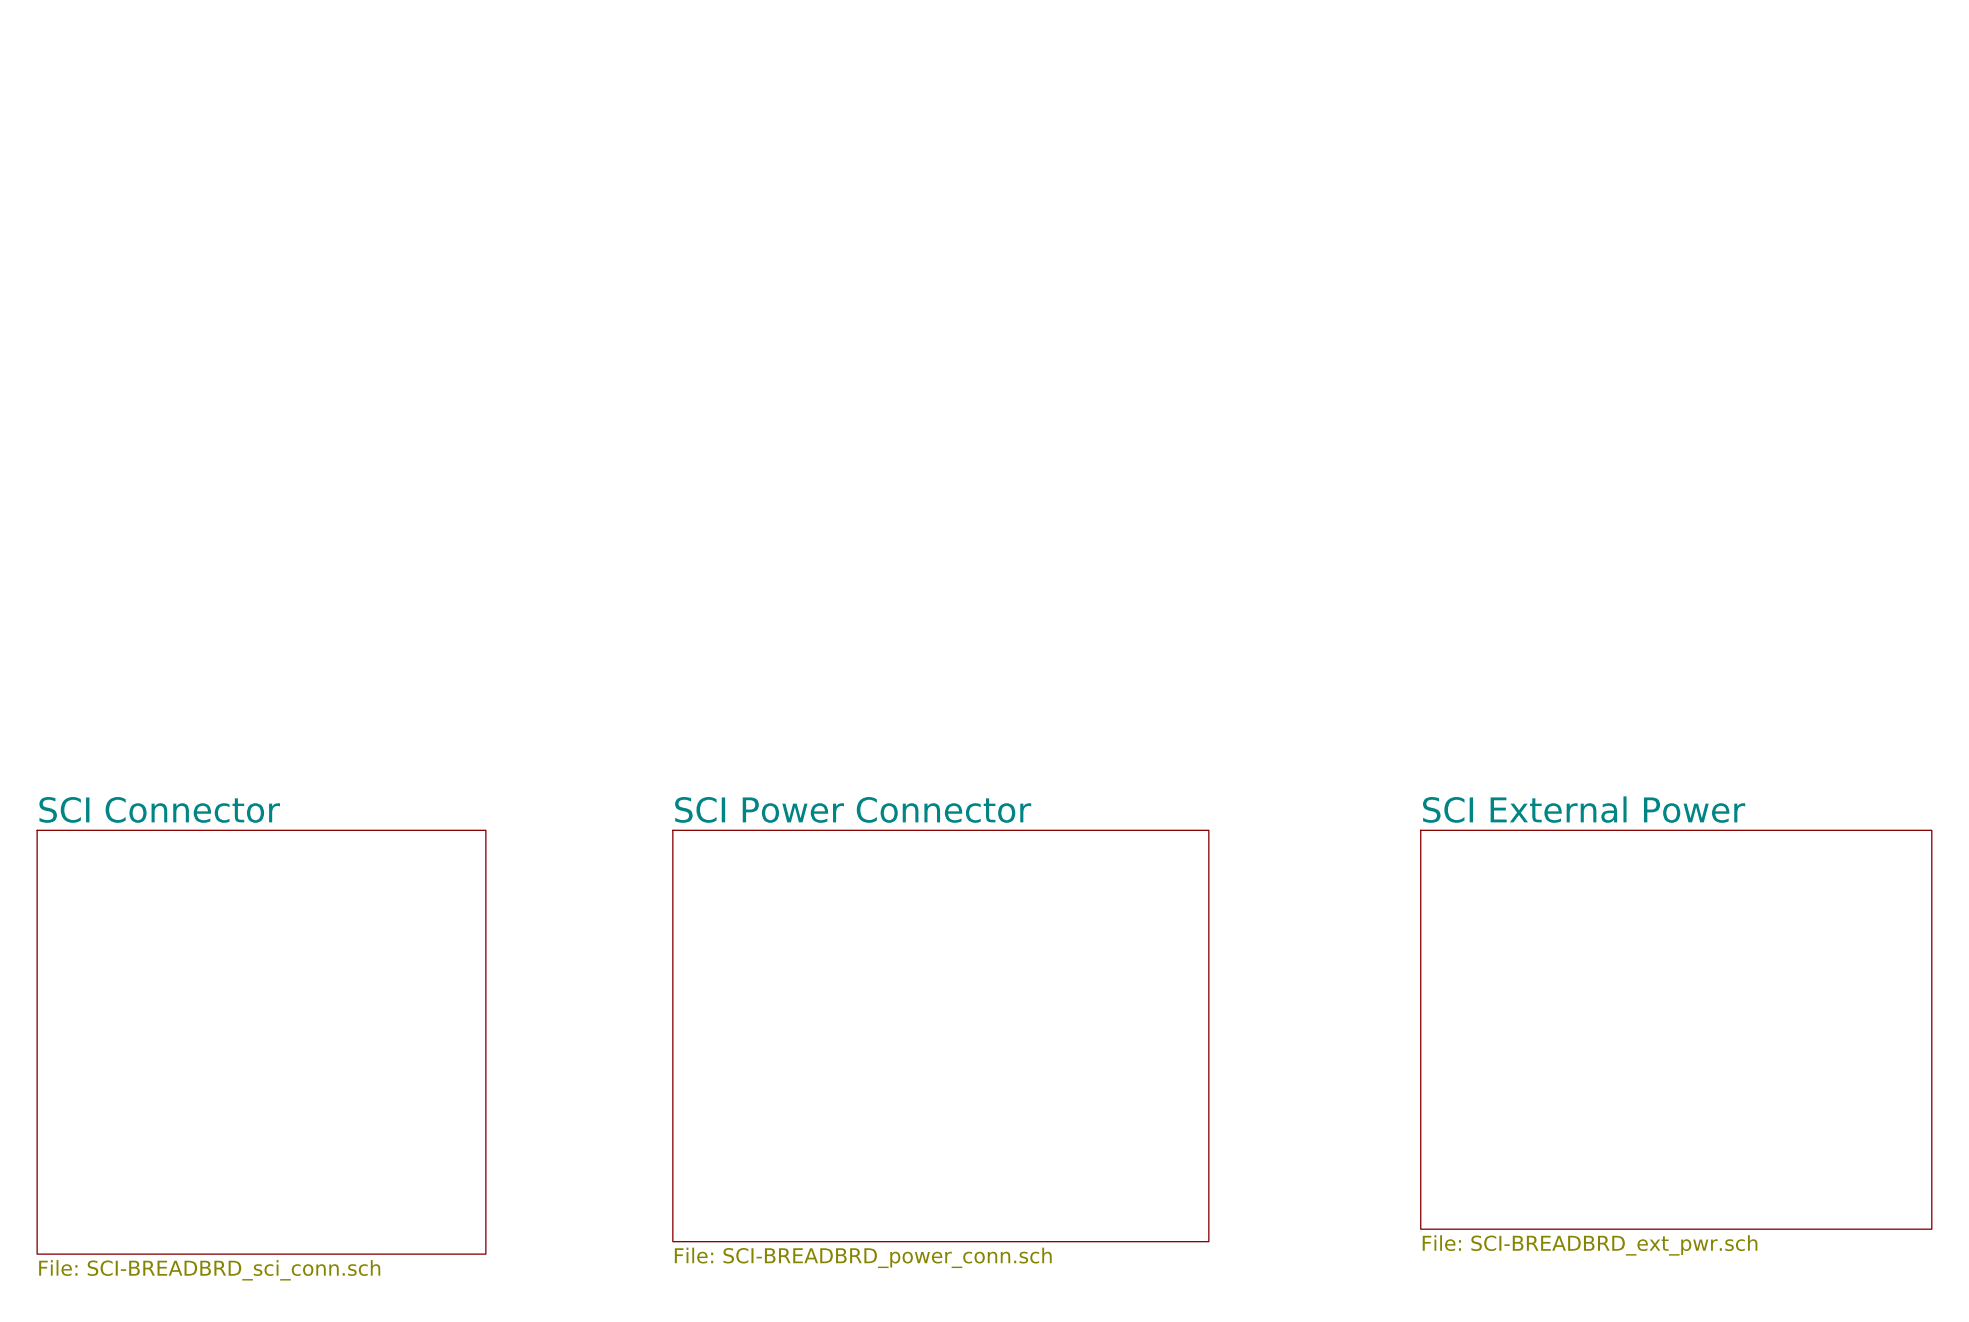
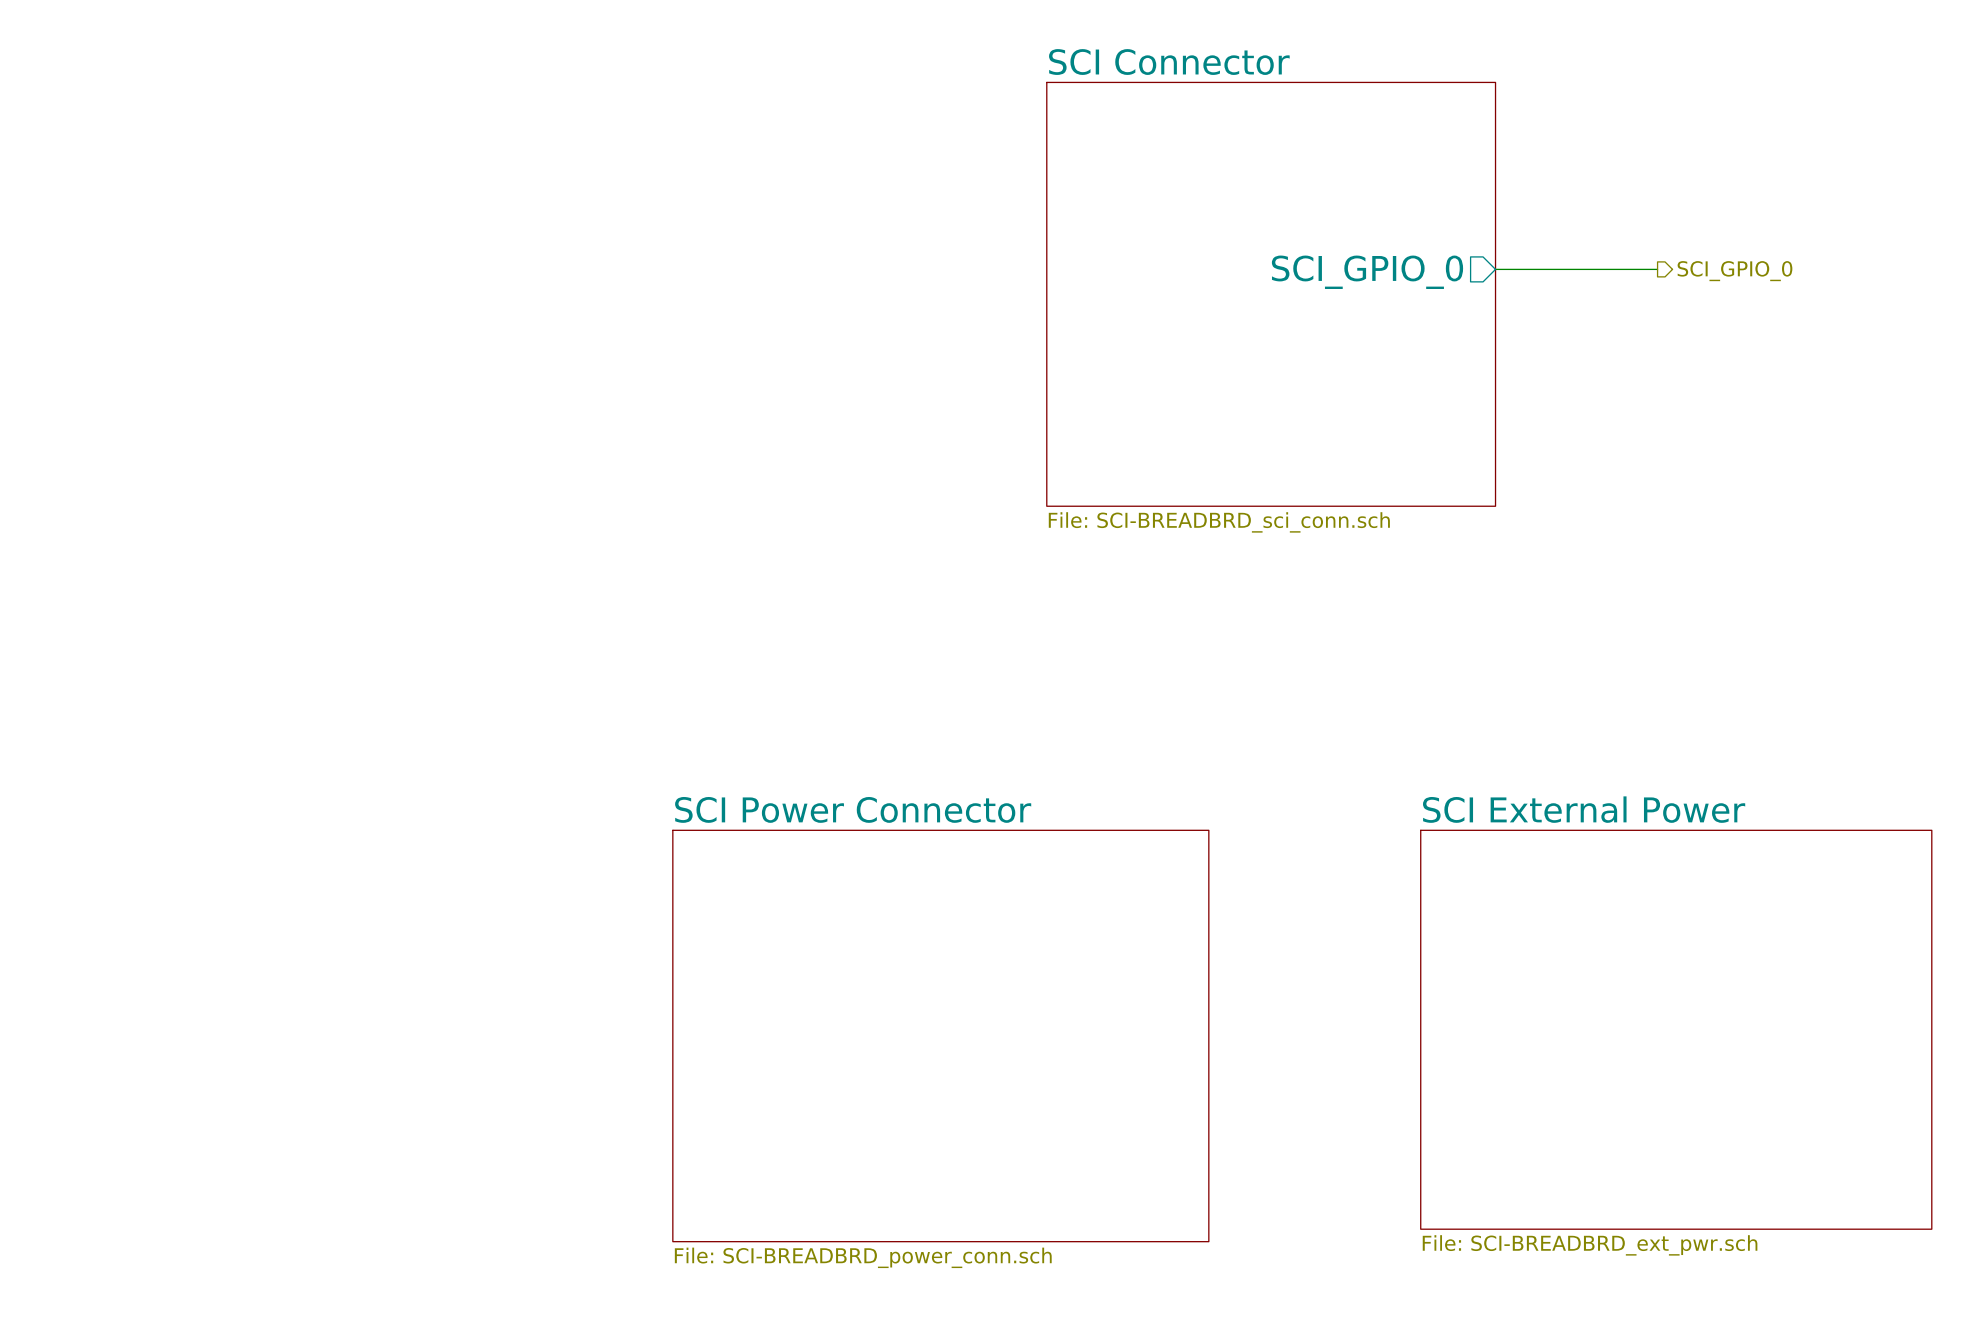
wire: none -> (1495, 269) (1657, 269)
hierarchical label: none -> SCI_GPIO_0 (1734, 271)
sheet pin: none -> SCI_GPIO_0 (1367, 272)
sheet SCI Connector: none -> File: SCI-BREADBRD_sci_conn.sch (1271, 294)
sheet SCI Connector: File: SCI-BREADBRD_sci_conn.sch (261, 1042) -> none

